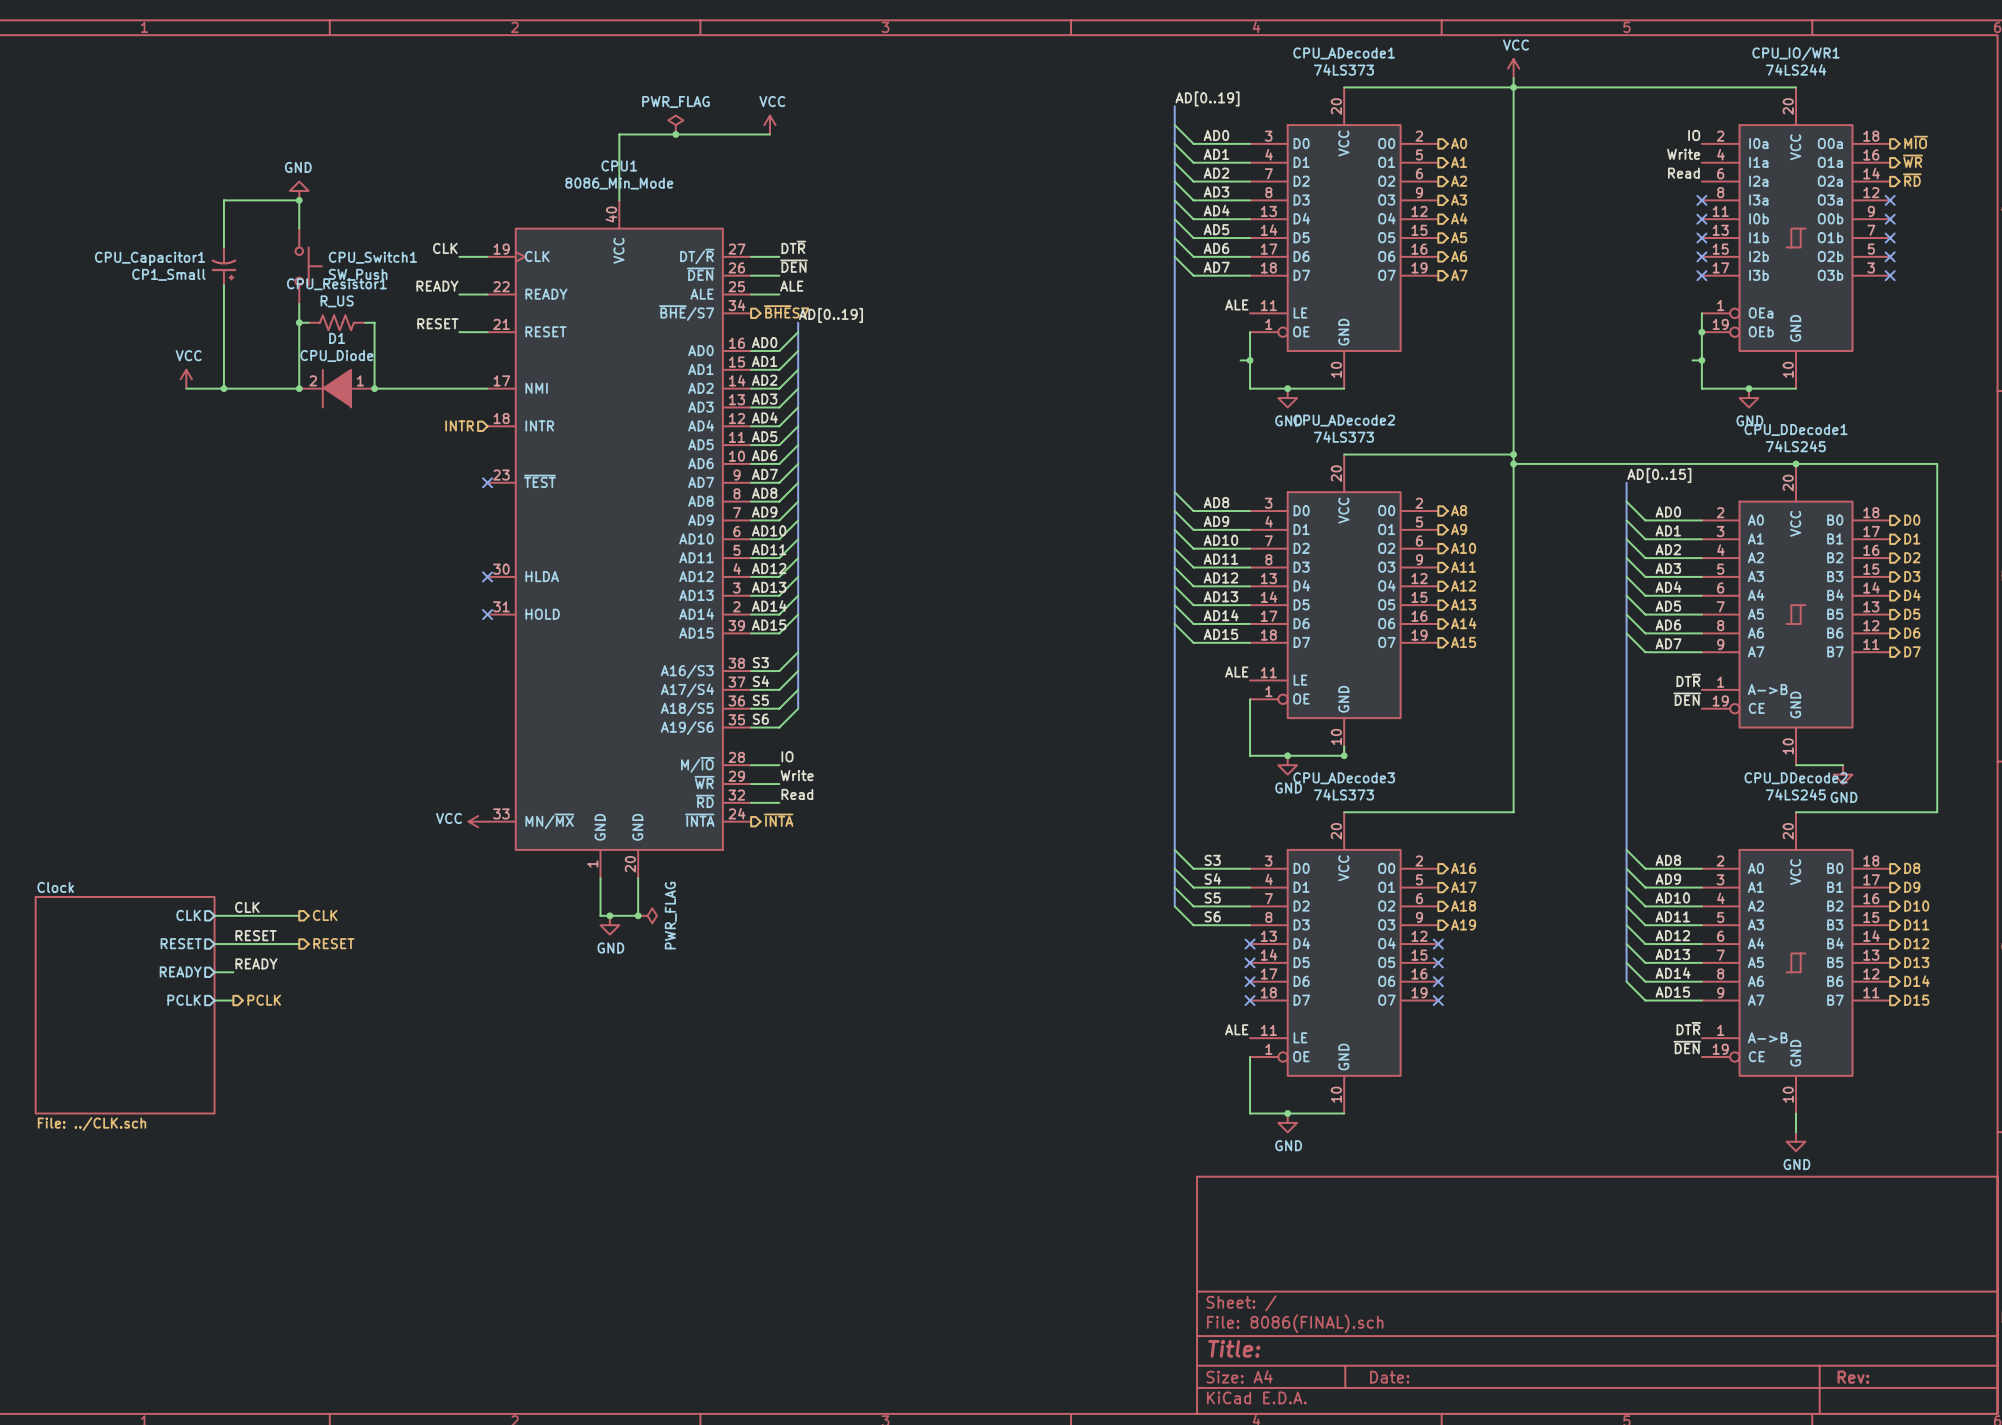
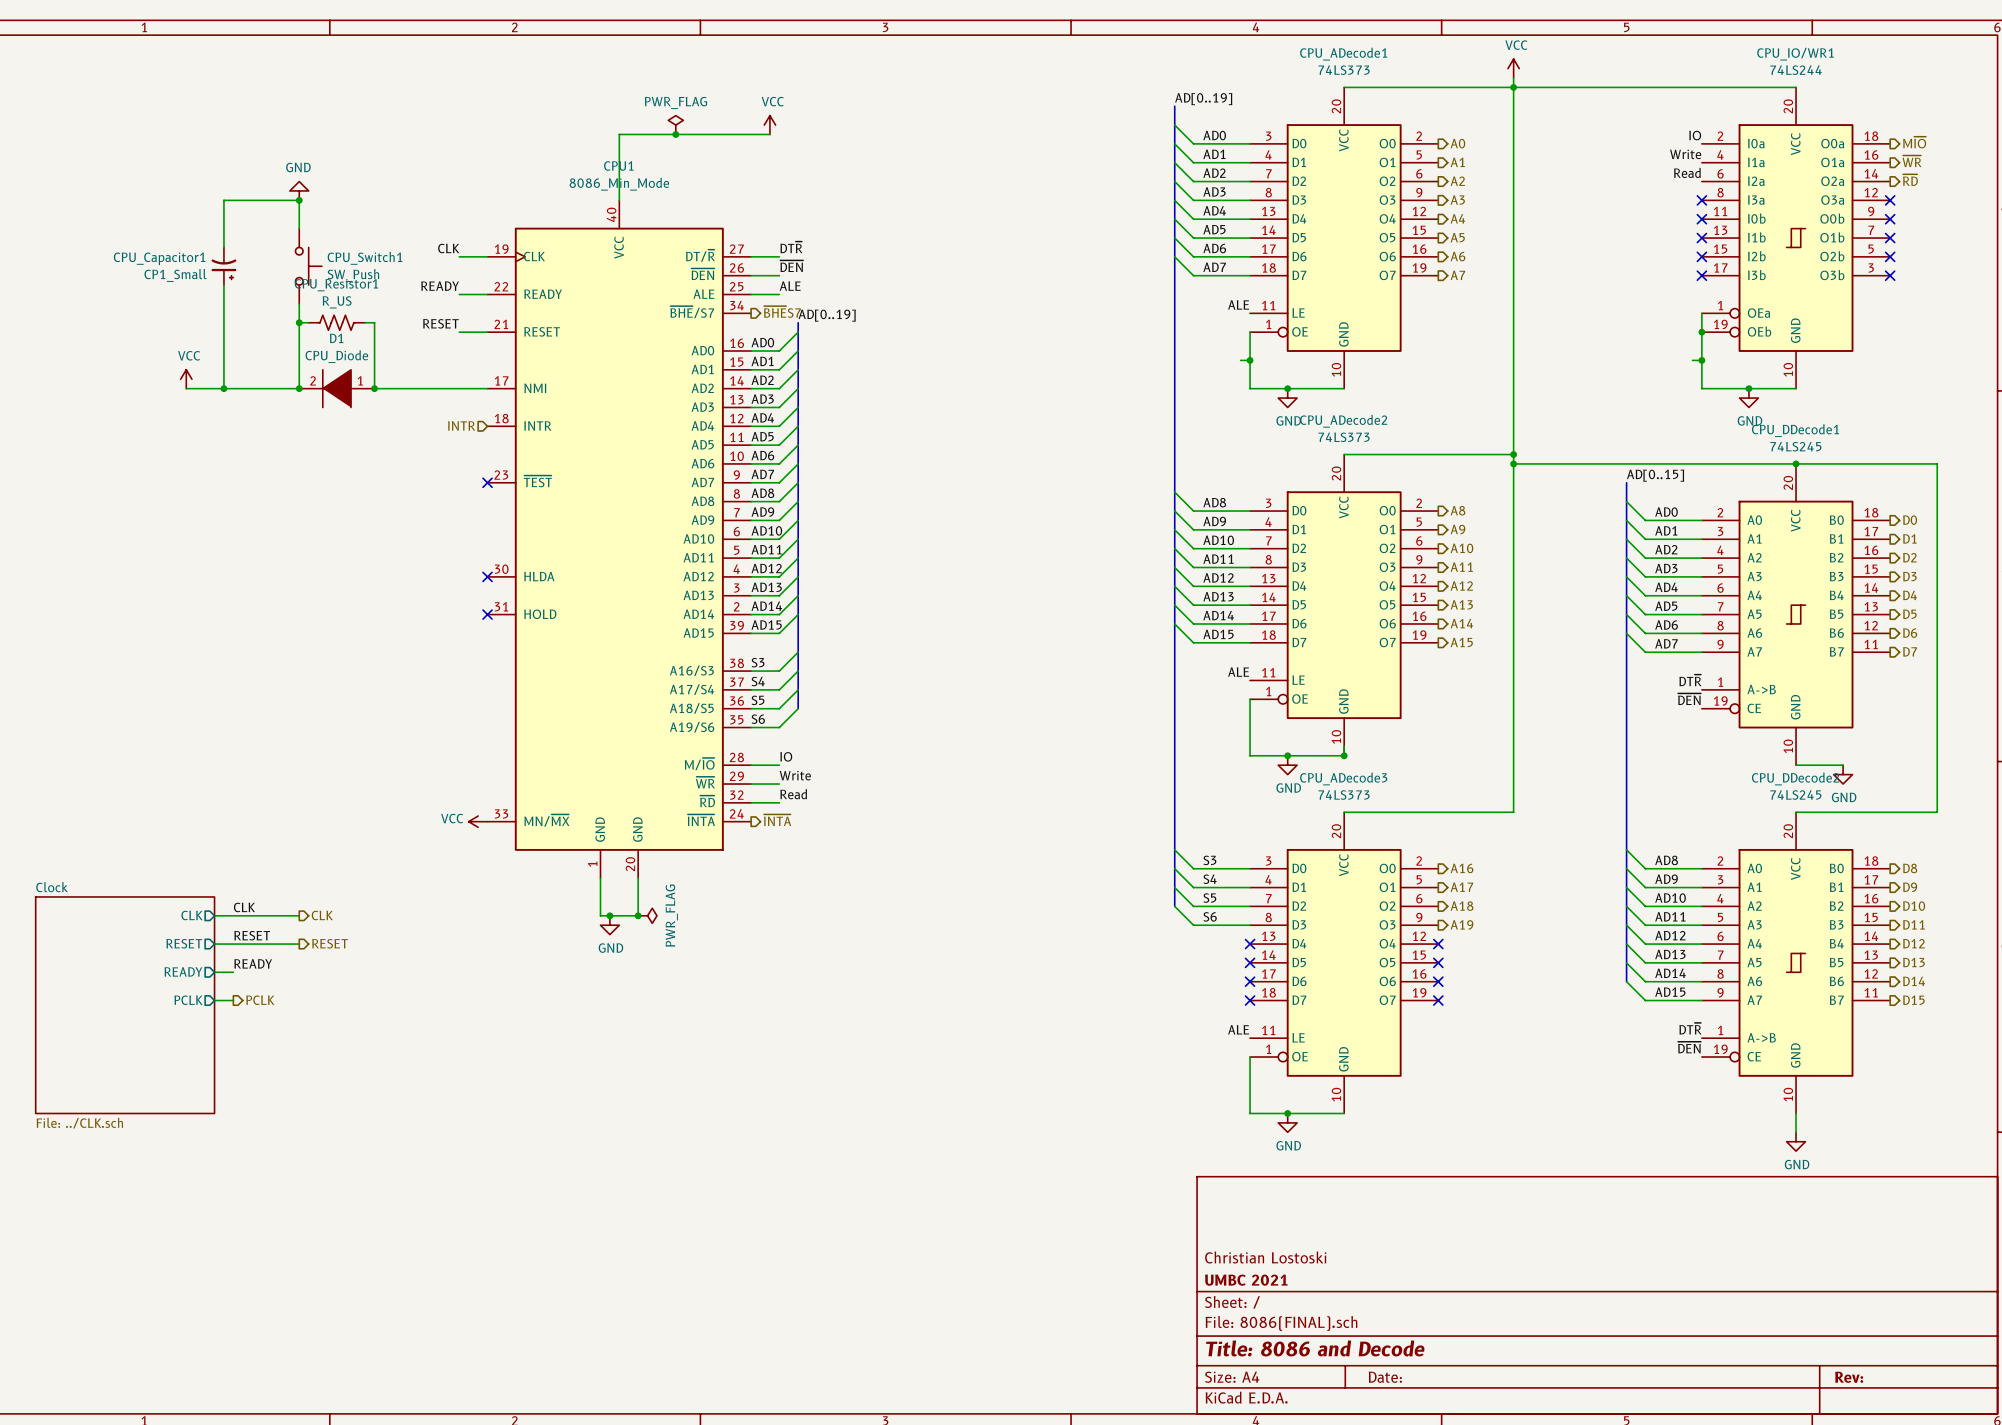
title block: none -> Christian Lostoski (1265, 1257)
title block: none -> UMBC 2021 (1246, 1280)
title block: Title: (1234, 1348) -> Title: 8086 and Decode (1315, 1348)

